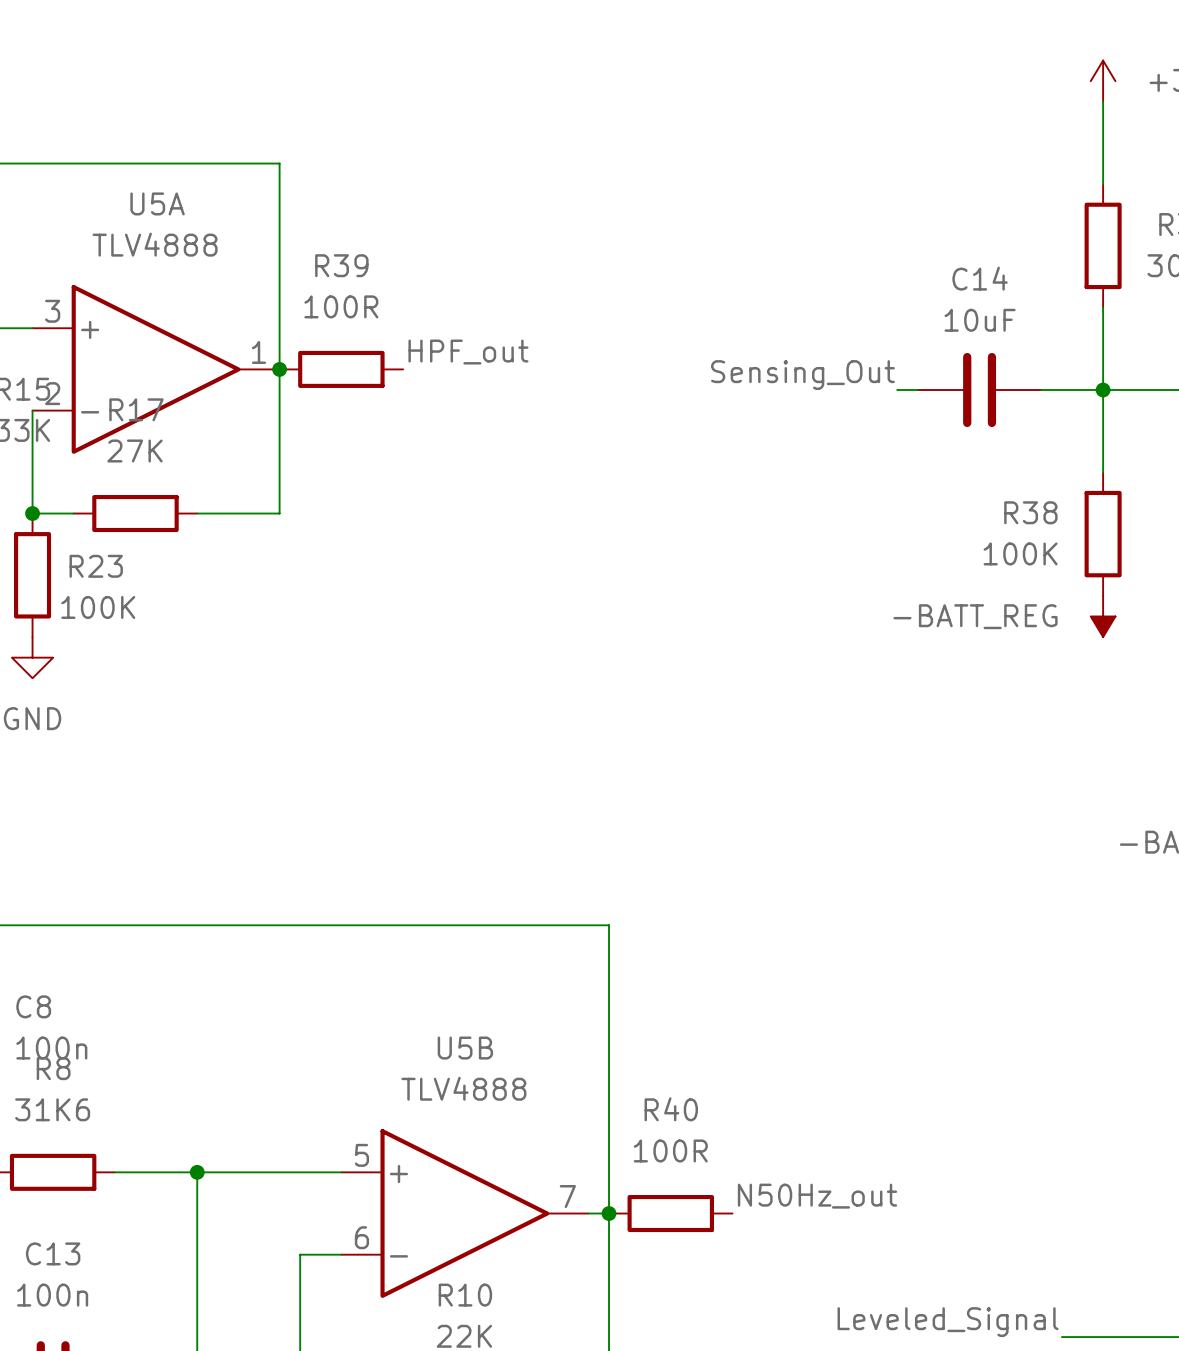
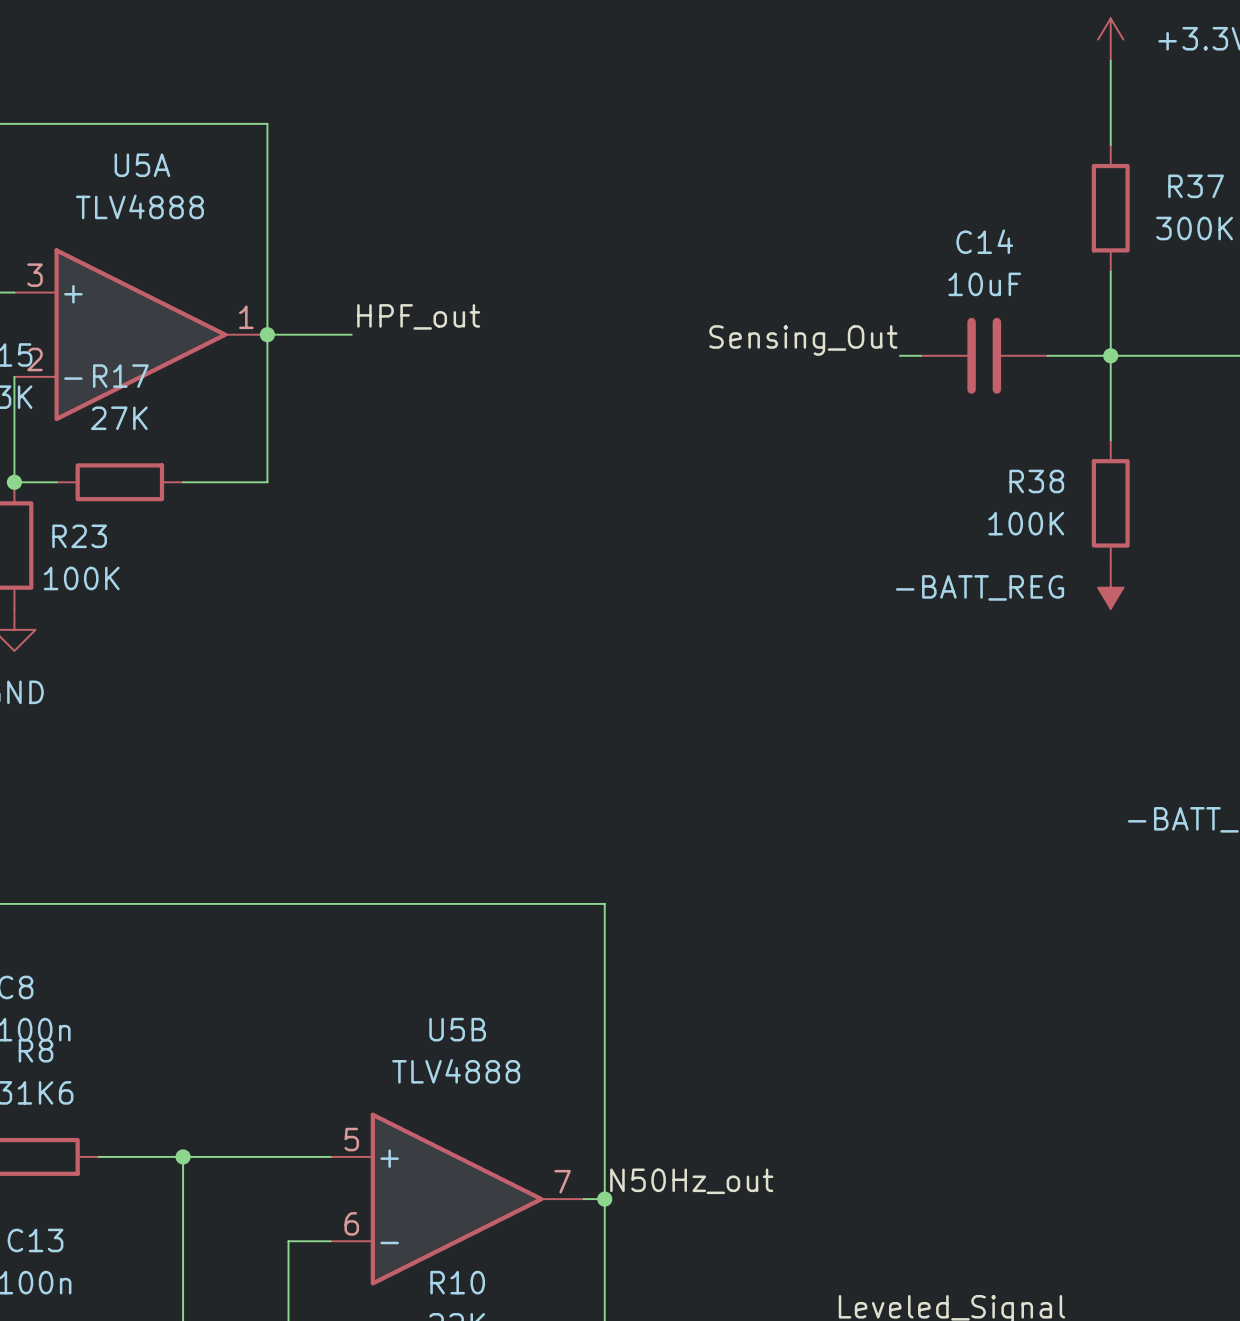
label position: HPF_out (468, 352) -> HPF_out (418, 316)
wire: none -> (267, 334) (351, 334)
R39: 100R (341, 369) -> none
label position: N50Hz_out (817, 1196) -> N50Hz_out (691, 1181)
R40: 100R (670, 1213) -> none

